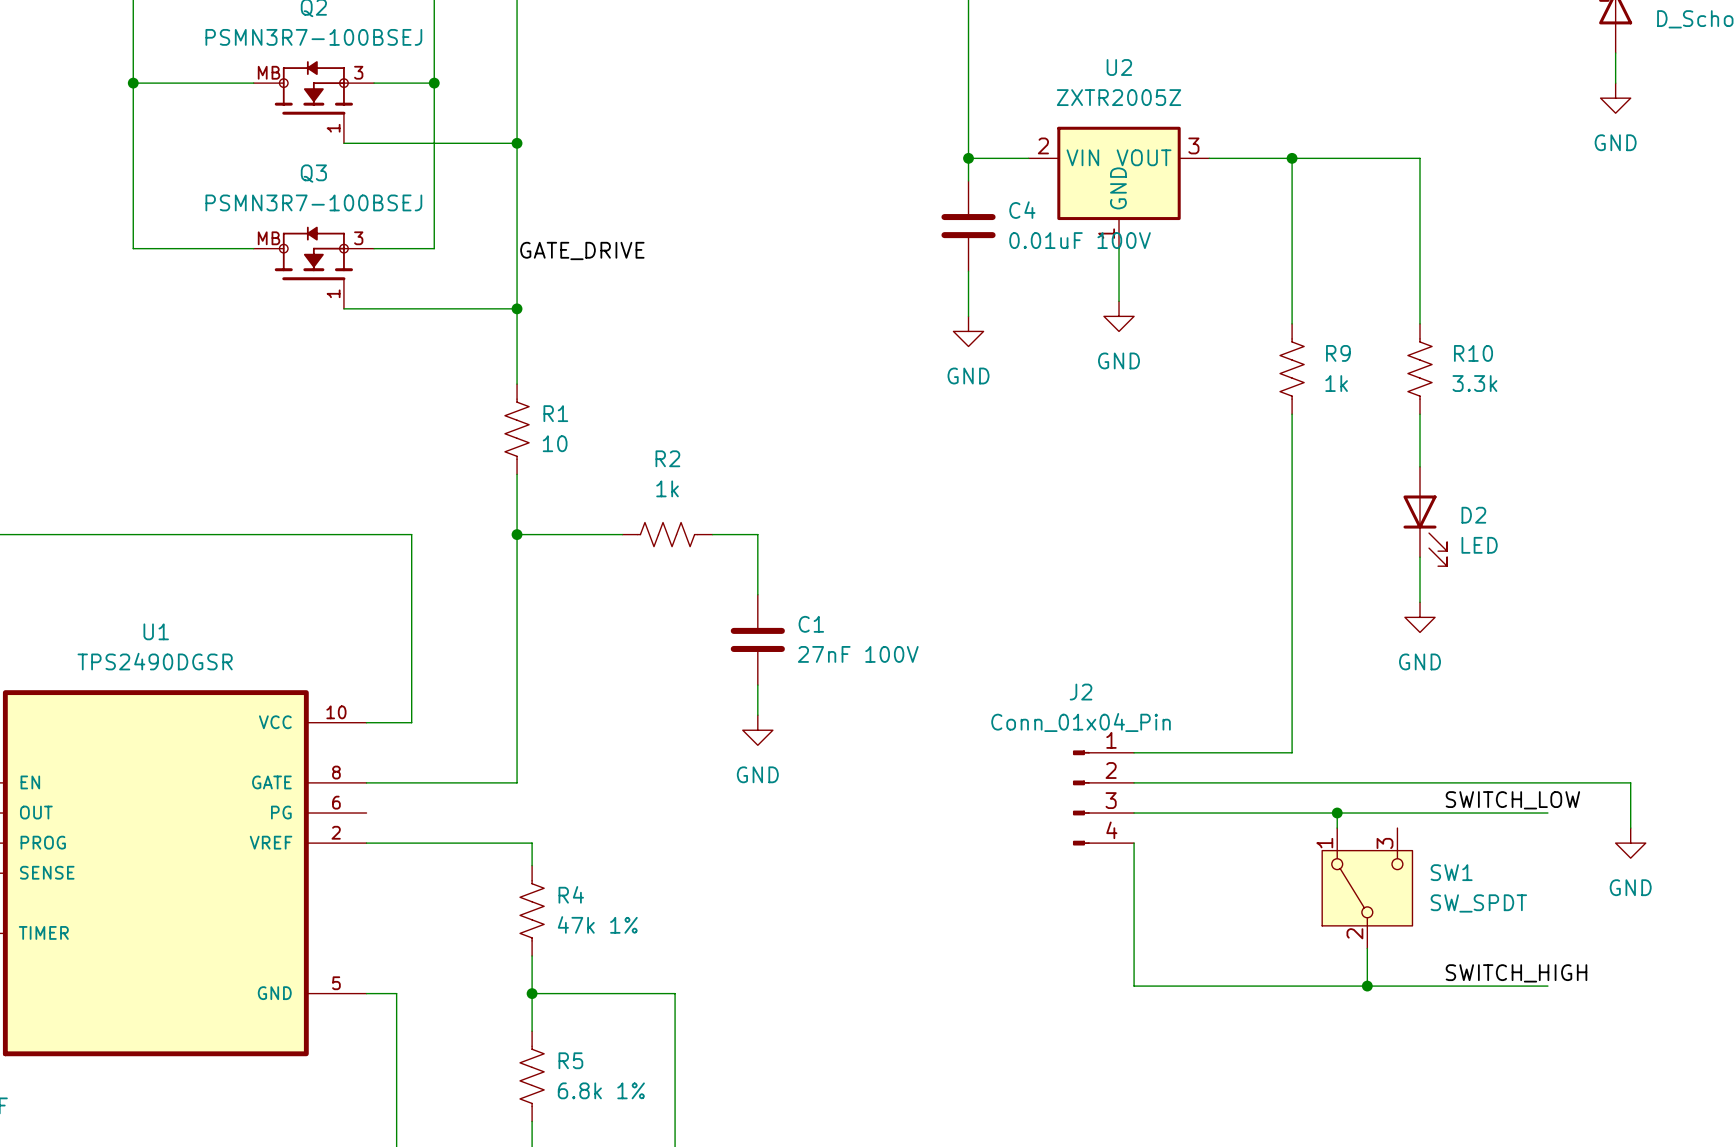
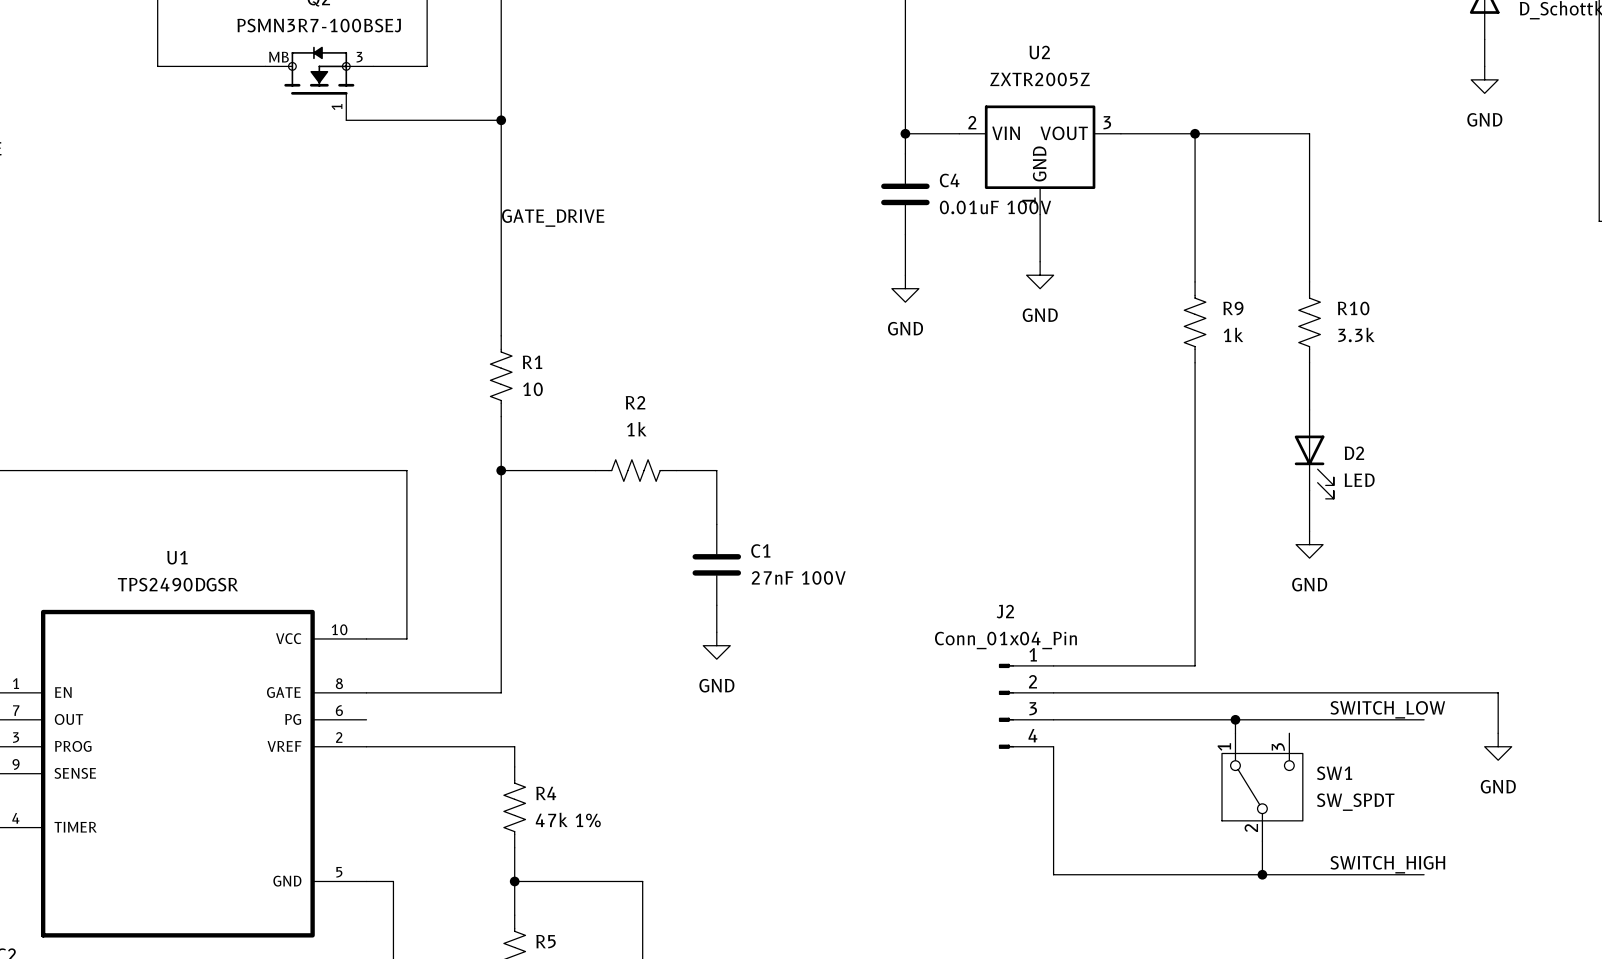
wire: (133, 83) (133, 248) (253, 248) -> none
junction: (133, 83) -> none
wire: (434, 83) (434, 248) (374, 248) -> none
junction: (434, 83) -> none
Q3: PSMN3R7-100BSEJ (313, 267) -> none
wire: (343, 308) (517, 308) -> none
junction: (517, 308) -> none

